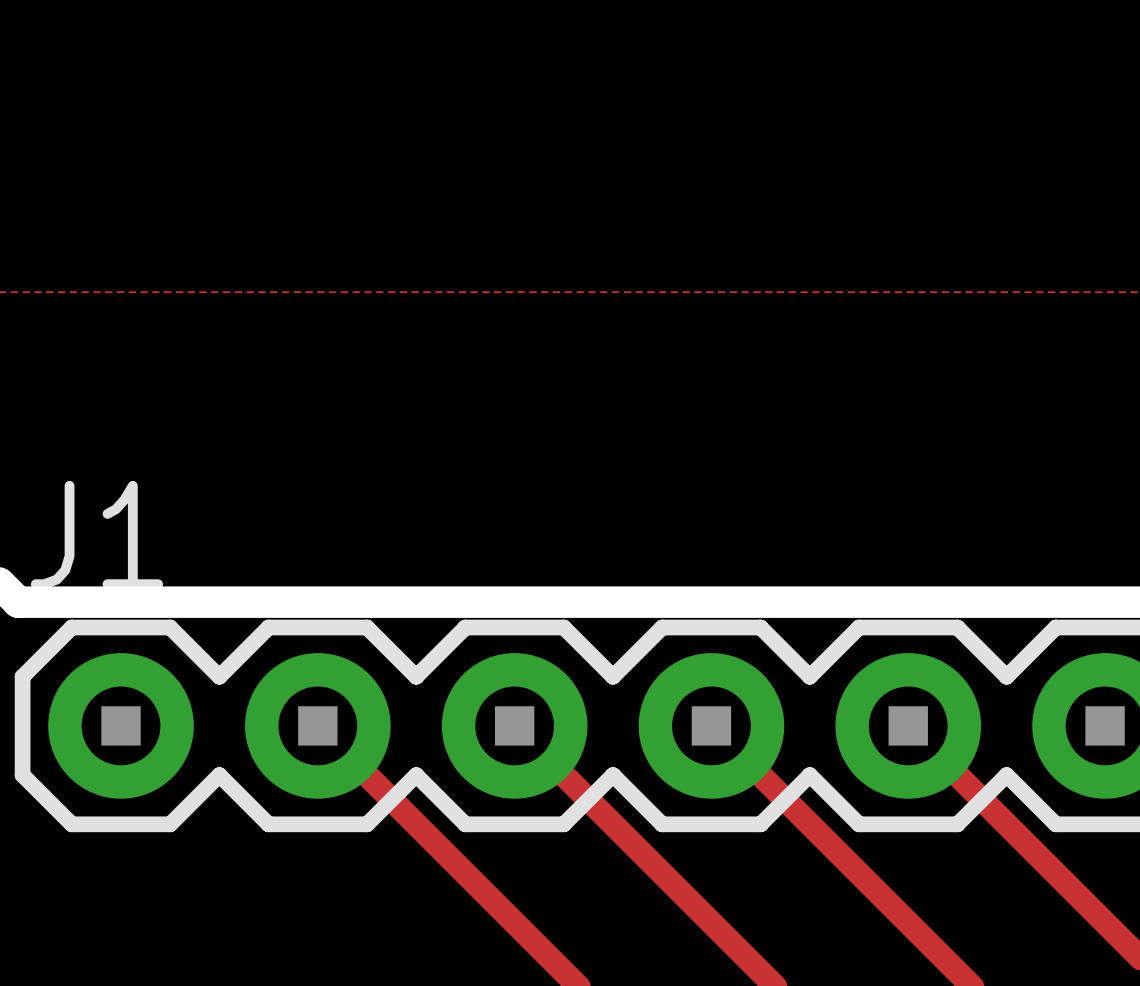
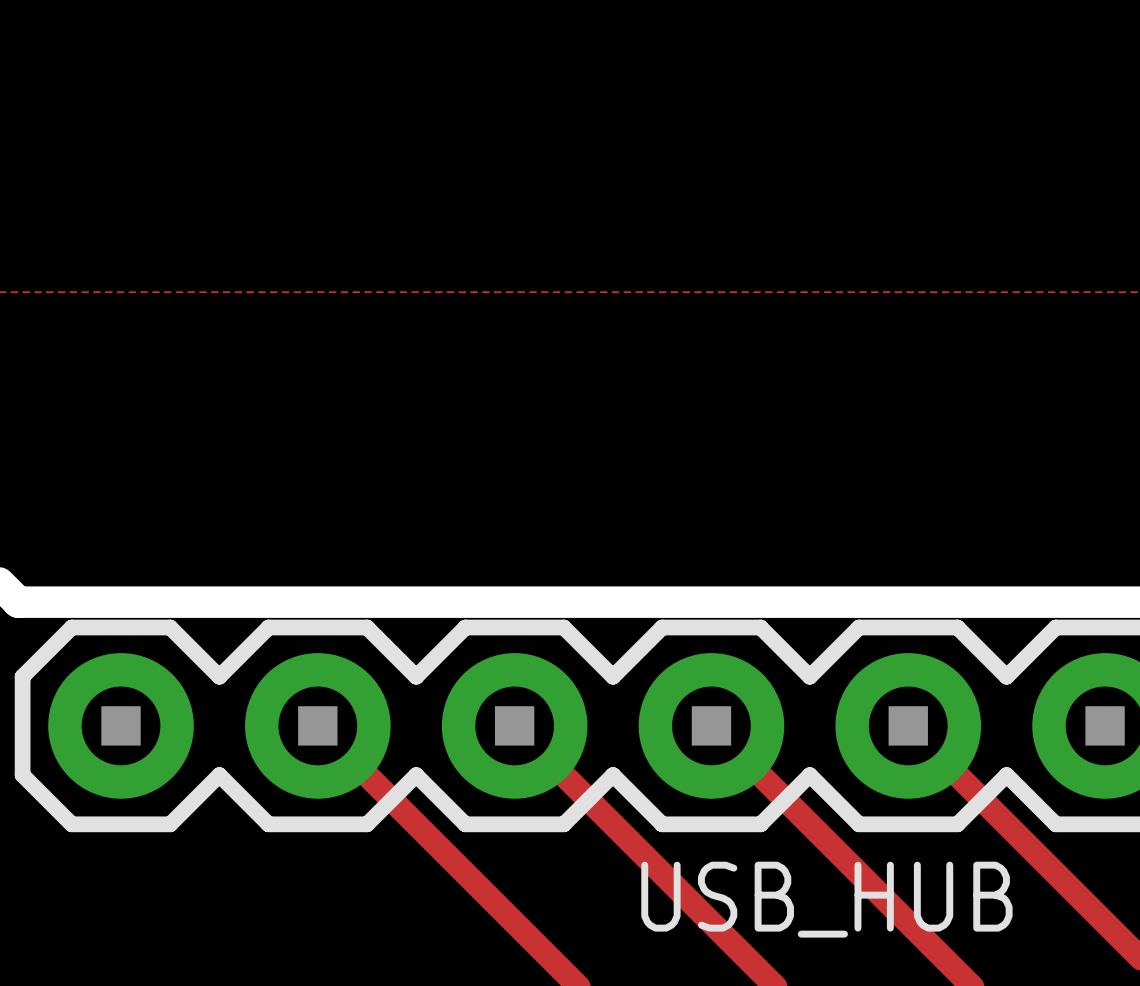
J1 name: J1 (96, 535) -> USB_HUB (826, 899)

